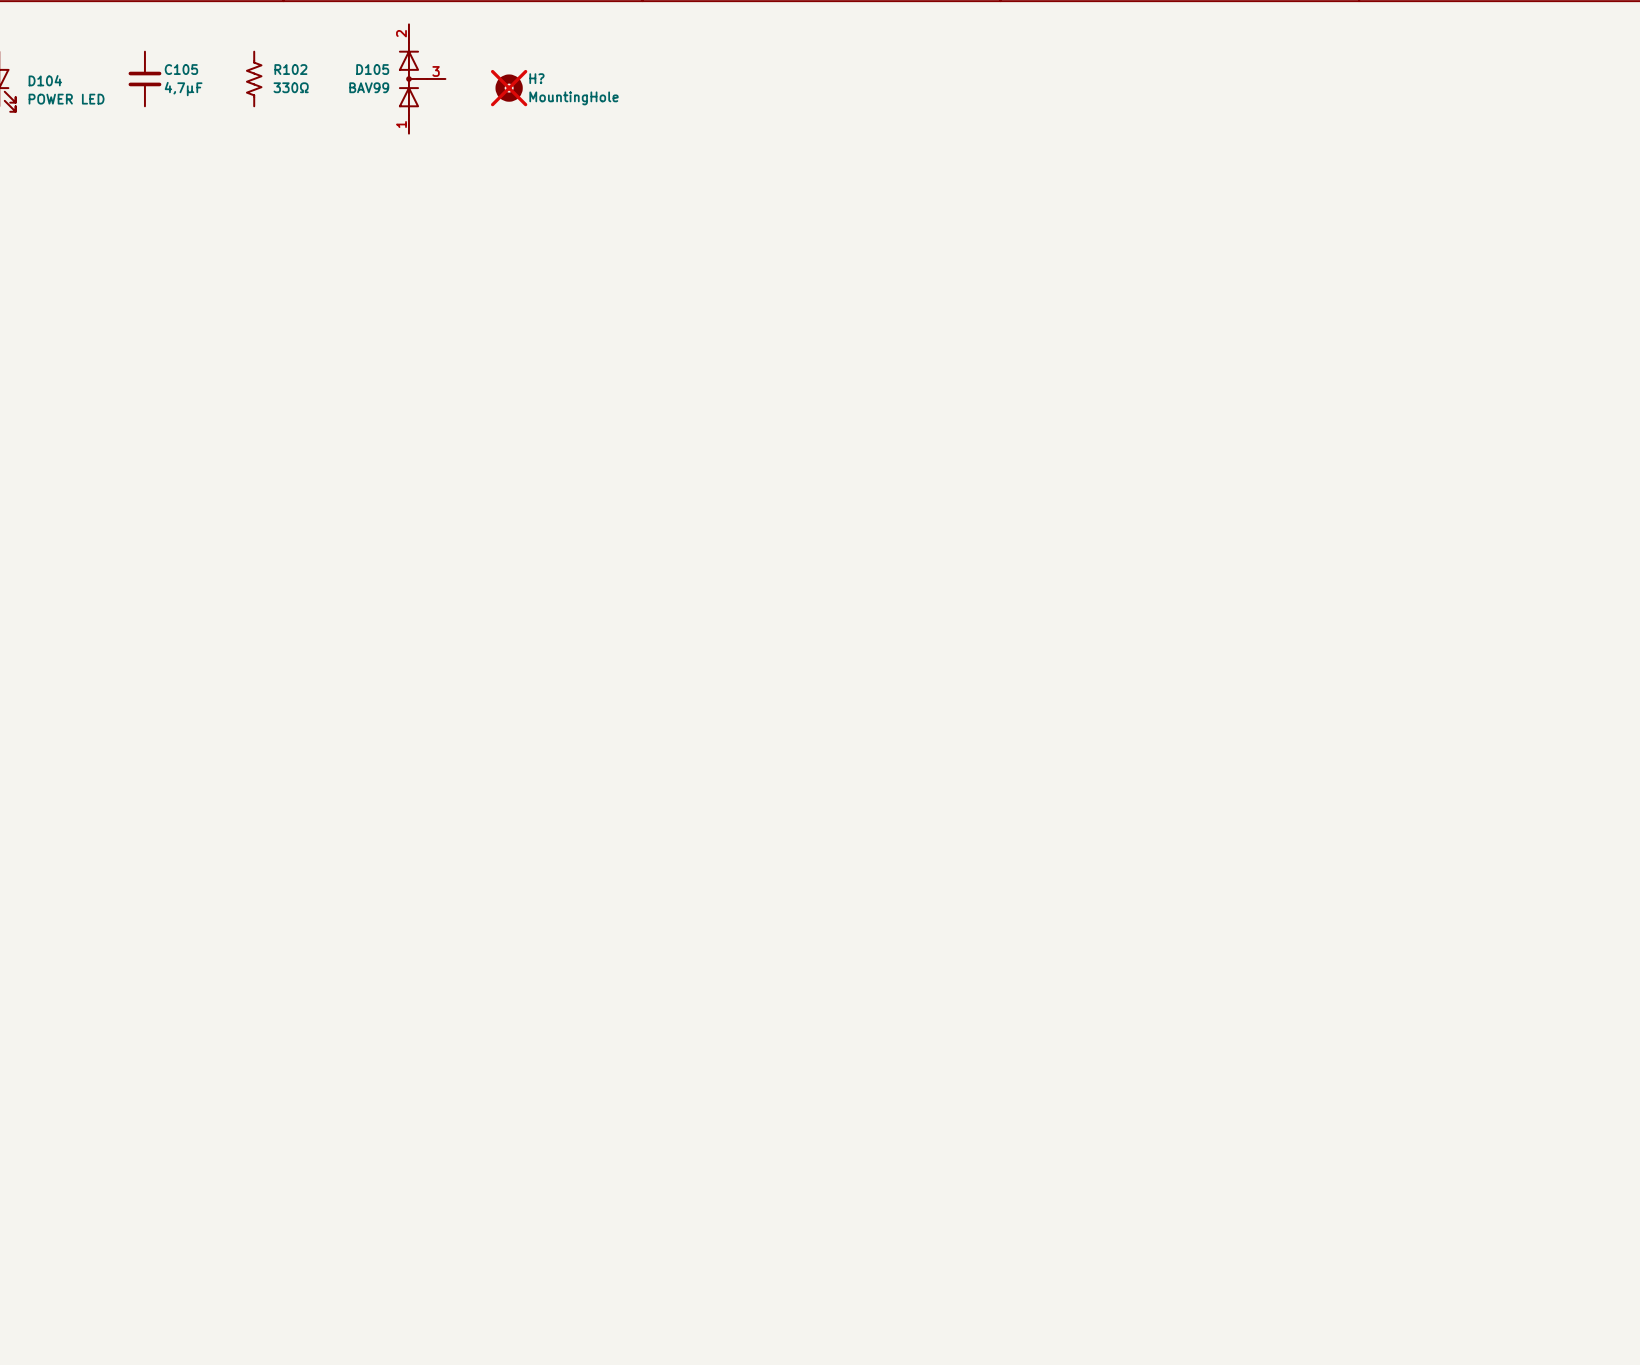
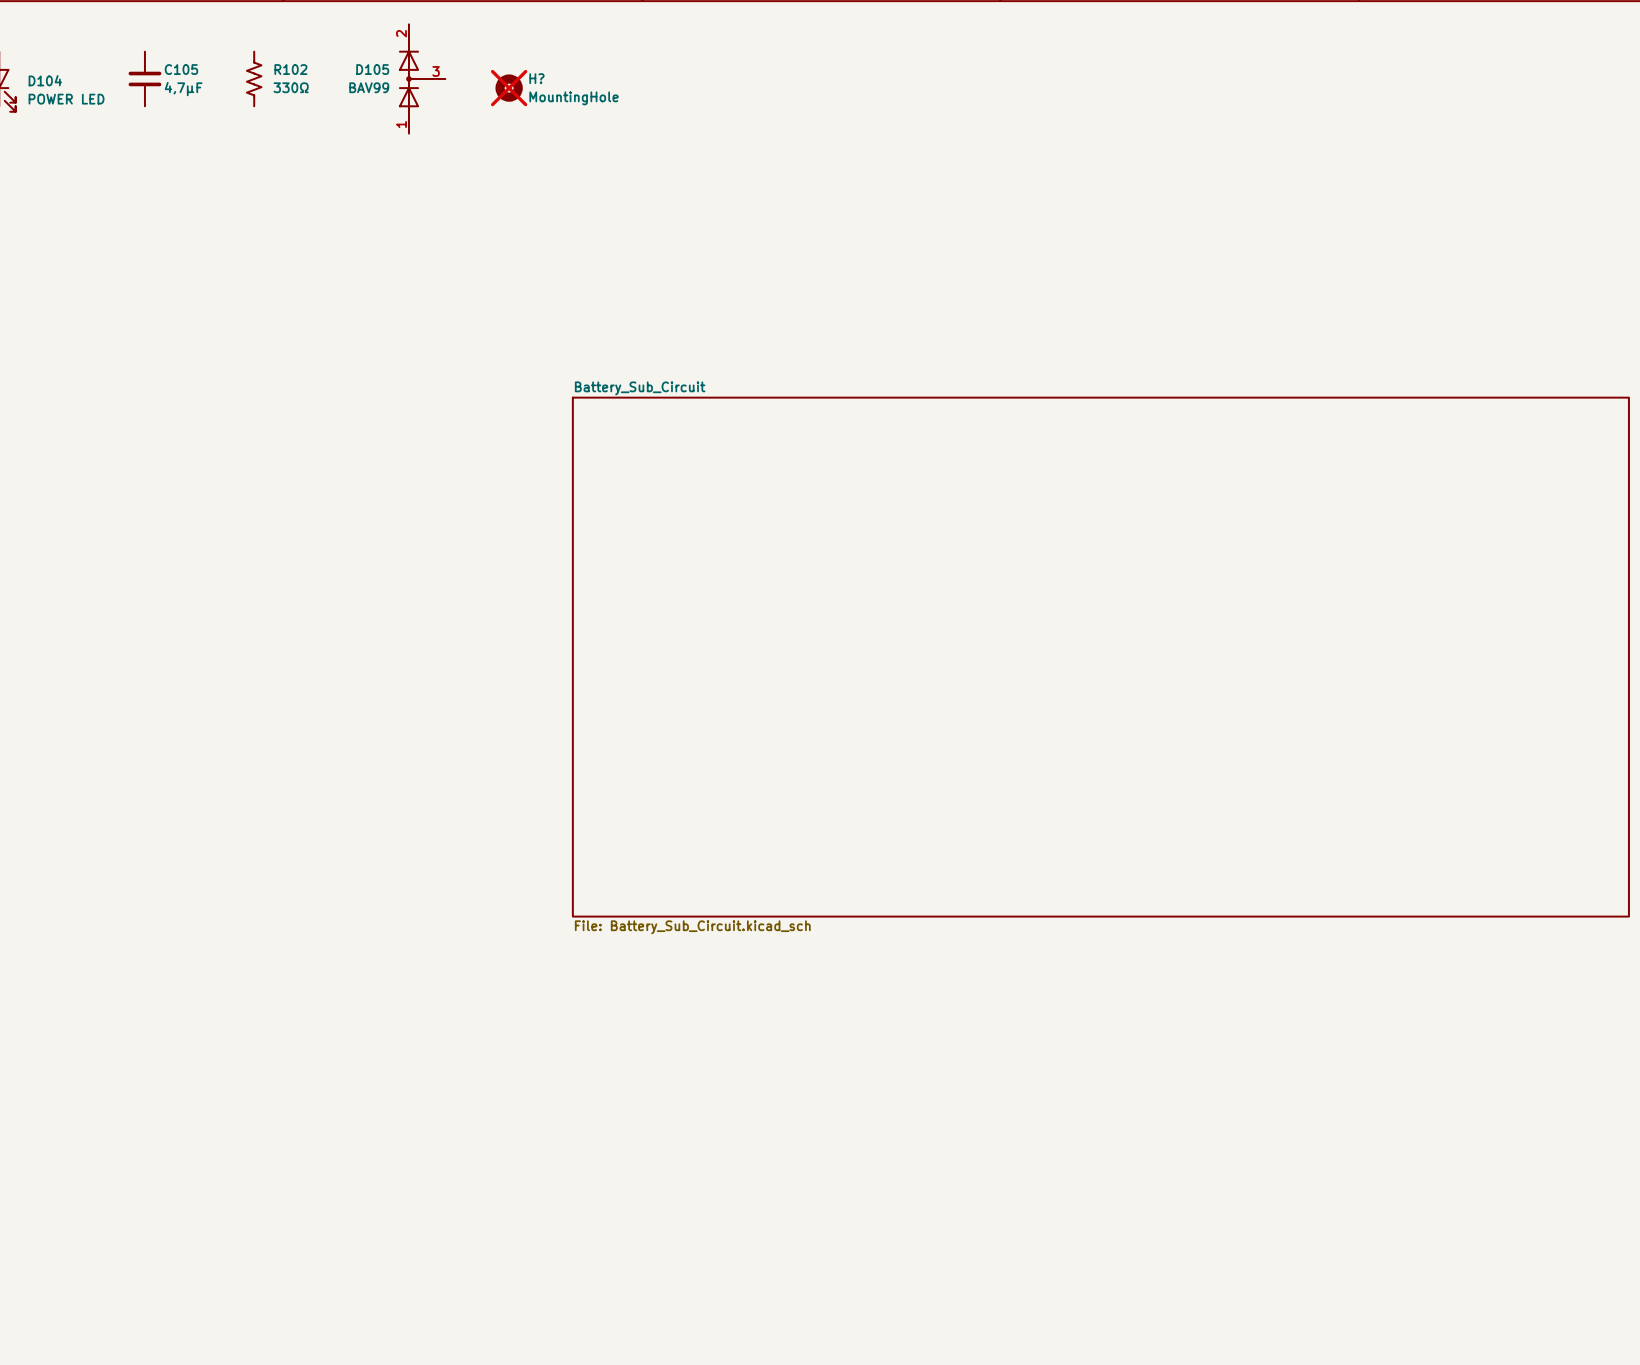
sheet Battery_Sub_Circuit: none -> File: Battery_Sub_Circuit.kicad_sch (1100, 657)

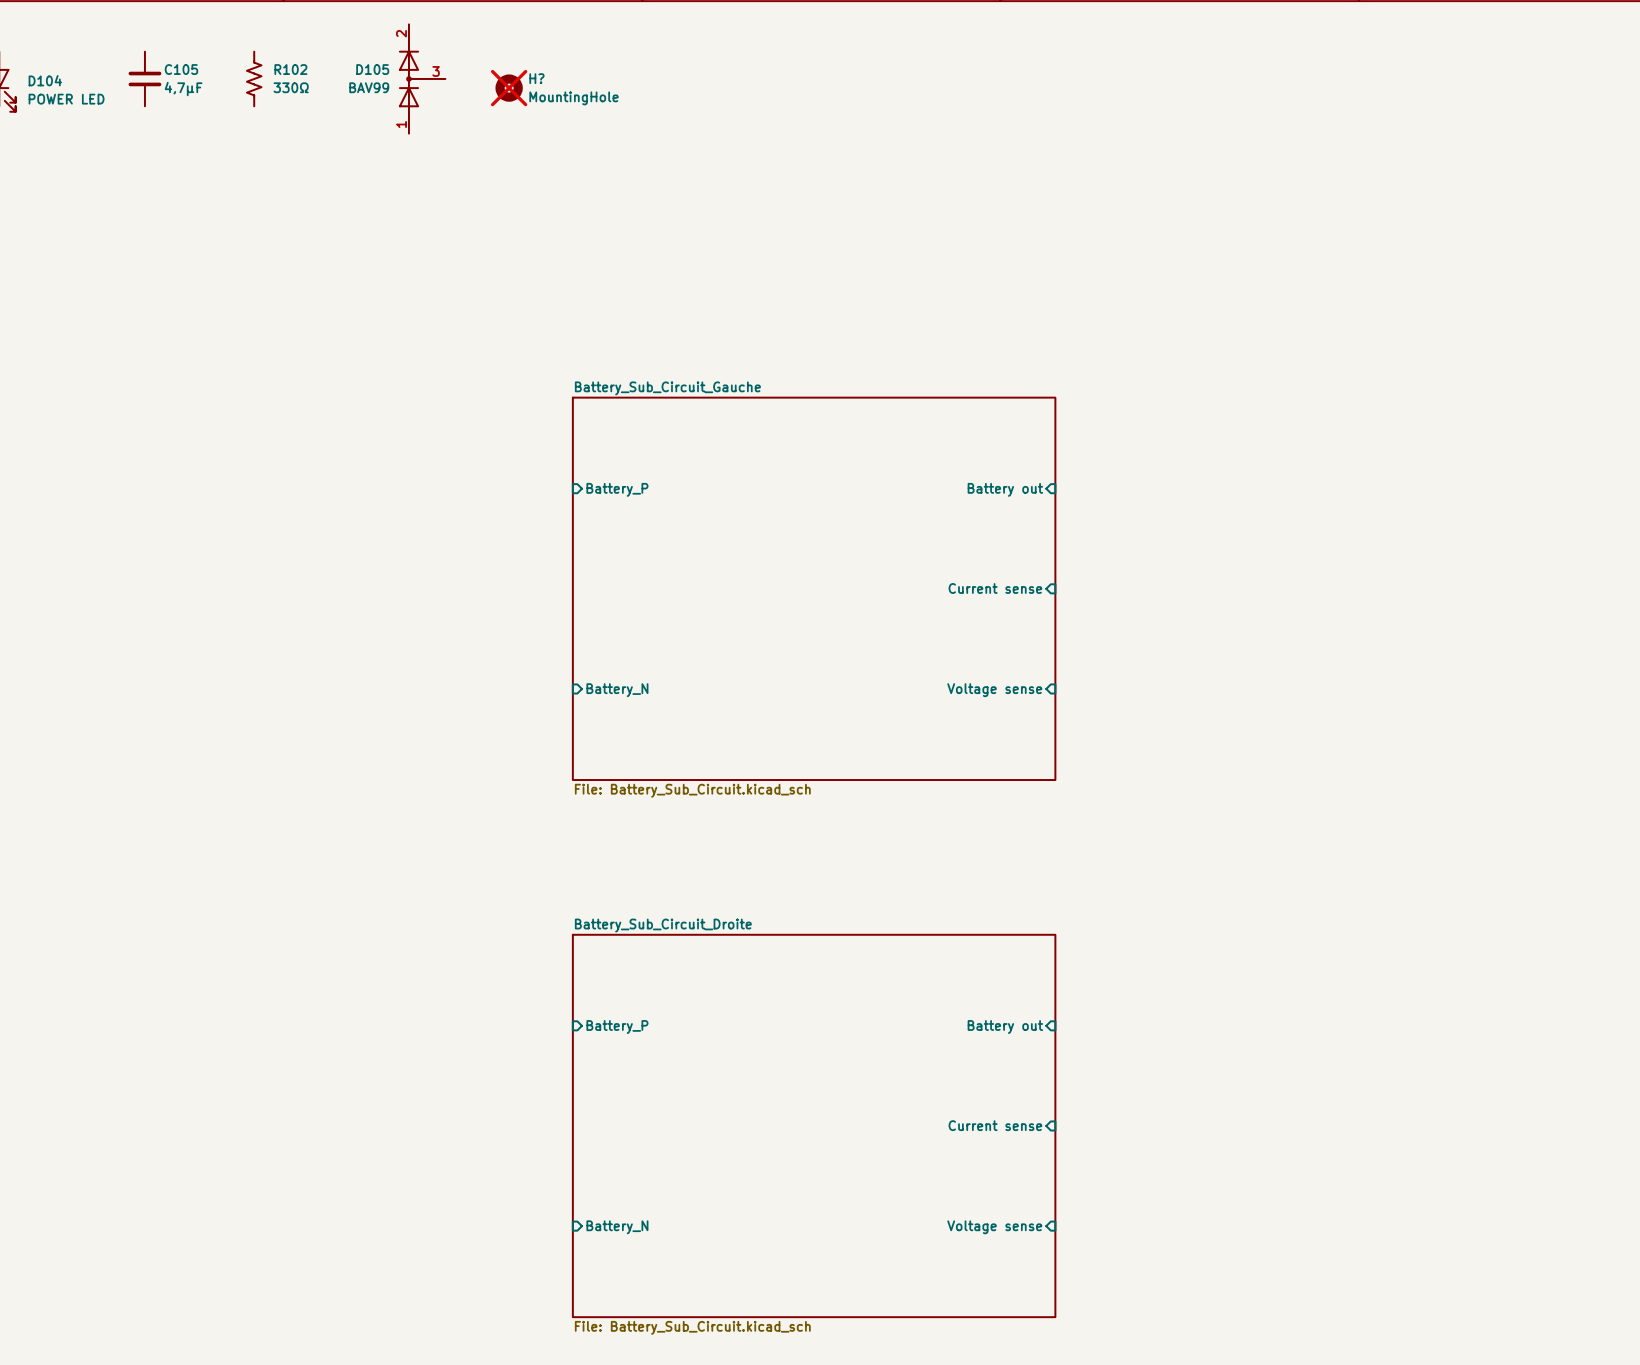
sheet pin: none -> Battery_P (617, 489)
sheet pin: none -> Battery out (1005, 489)
sheet Battery_Sub_Circuit_Gauche: none -> File: Battery_Sub_Circuit.kicad_sch (814, 588)
sheet pin: none -> Current sense (995, 588)
sheet Battery_Sub_Circuit: File: Battery_Sub_Circuit.kicad_sch (1100, 657) -> none
sheet pin: none -> Battery_N (617, 690)
sheet pin: none -> Voltage sense (994, 690)
sheet pin: none -> Battery_P (617, 1027)
sheet pin: none -> Battery out (1005, 1027)
sheet Battery_Sub_Circuit_Droite: none -> File: Battery_Sub_Circuit.kicad_sch (814, 1125)
sheet pin: none -> Current sense (995, 1125)
sheet pin: none -> Battery_N (617, 1227)
sheet pin: none -> Voltage sense (994, 1227)

